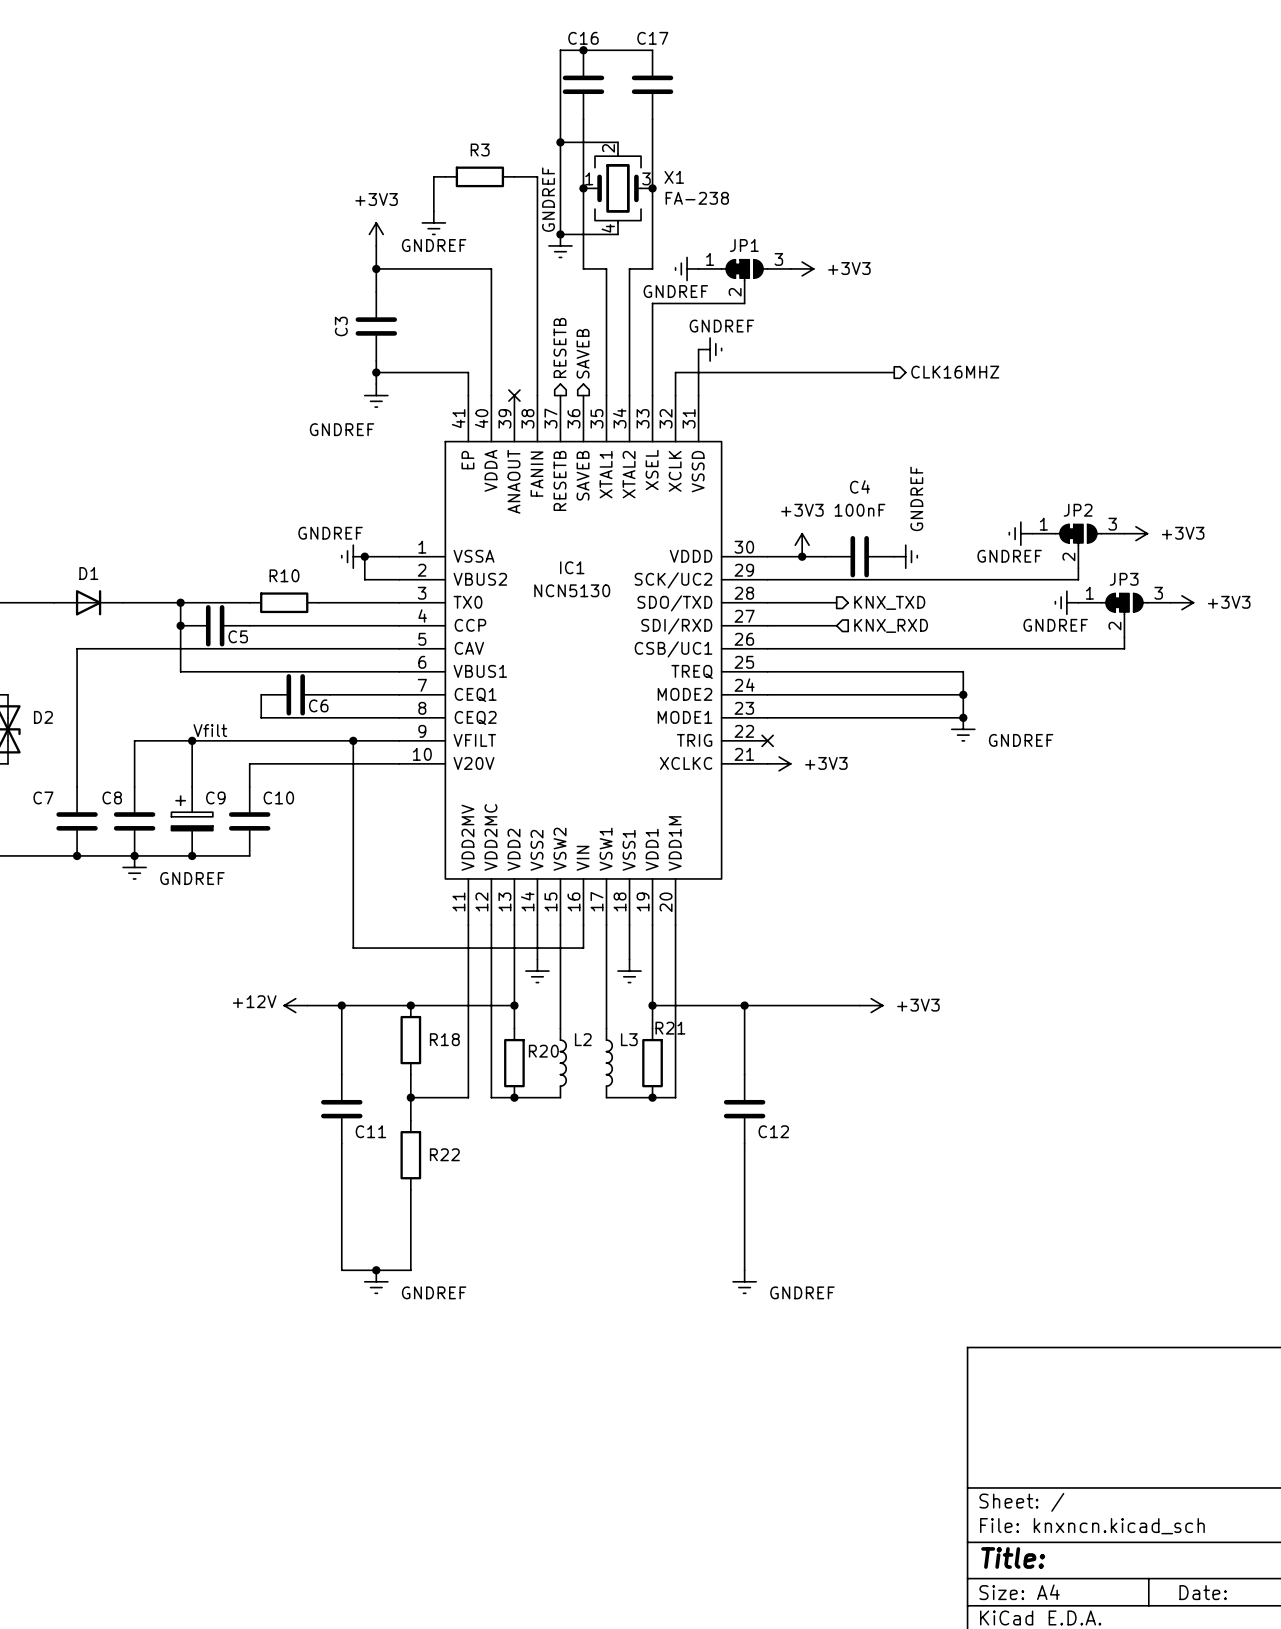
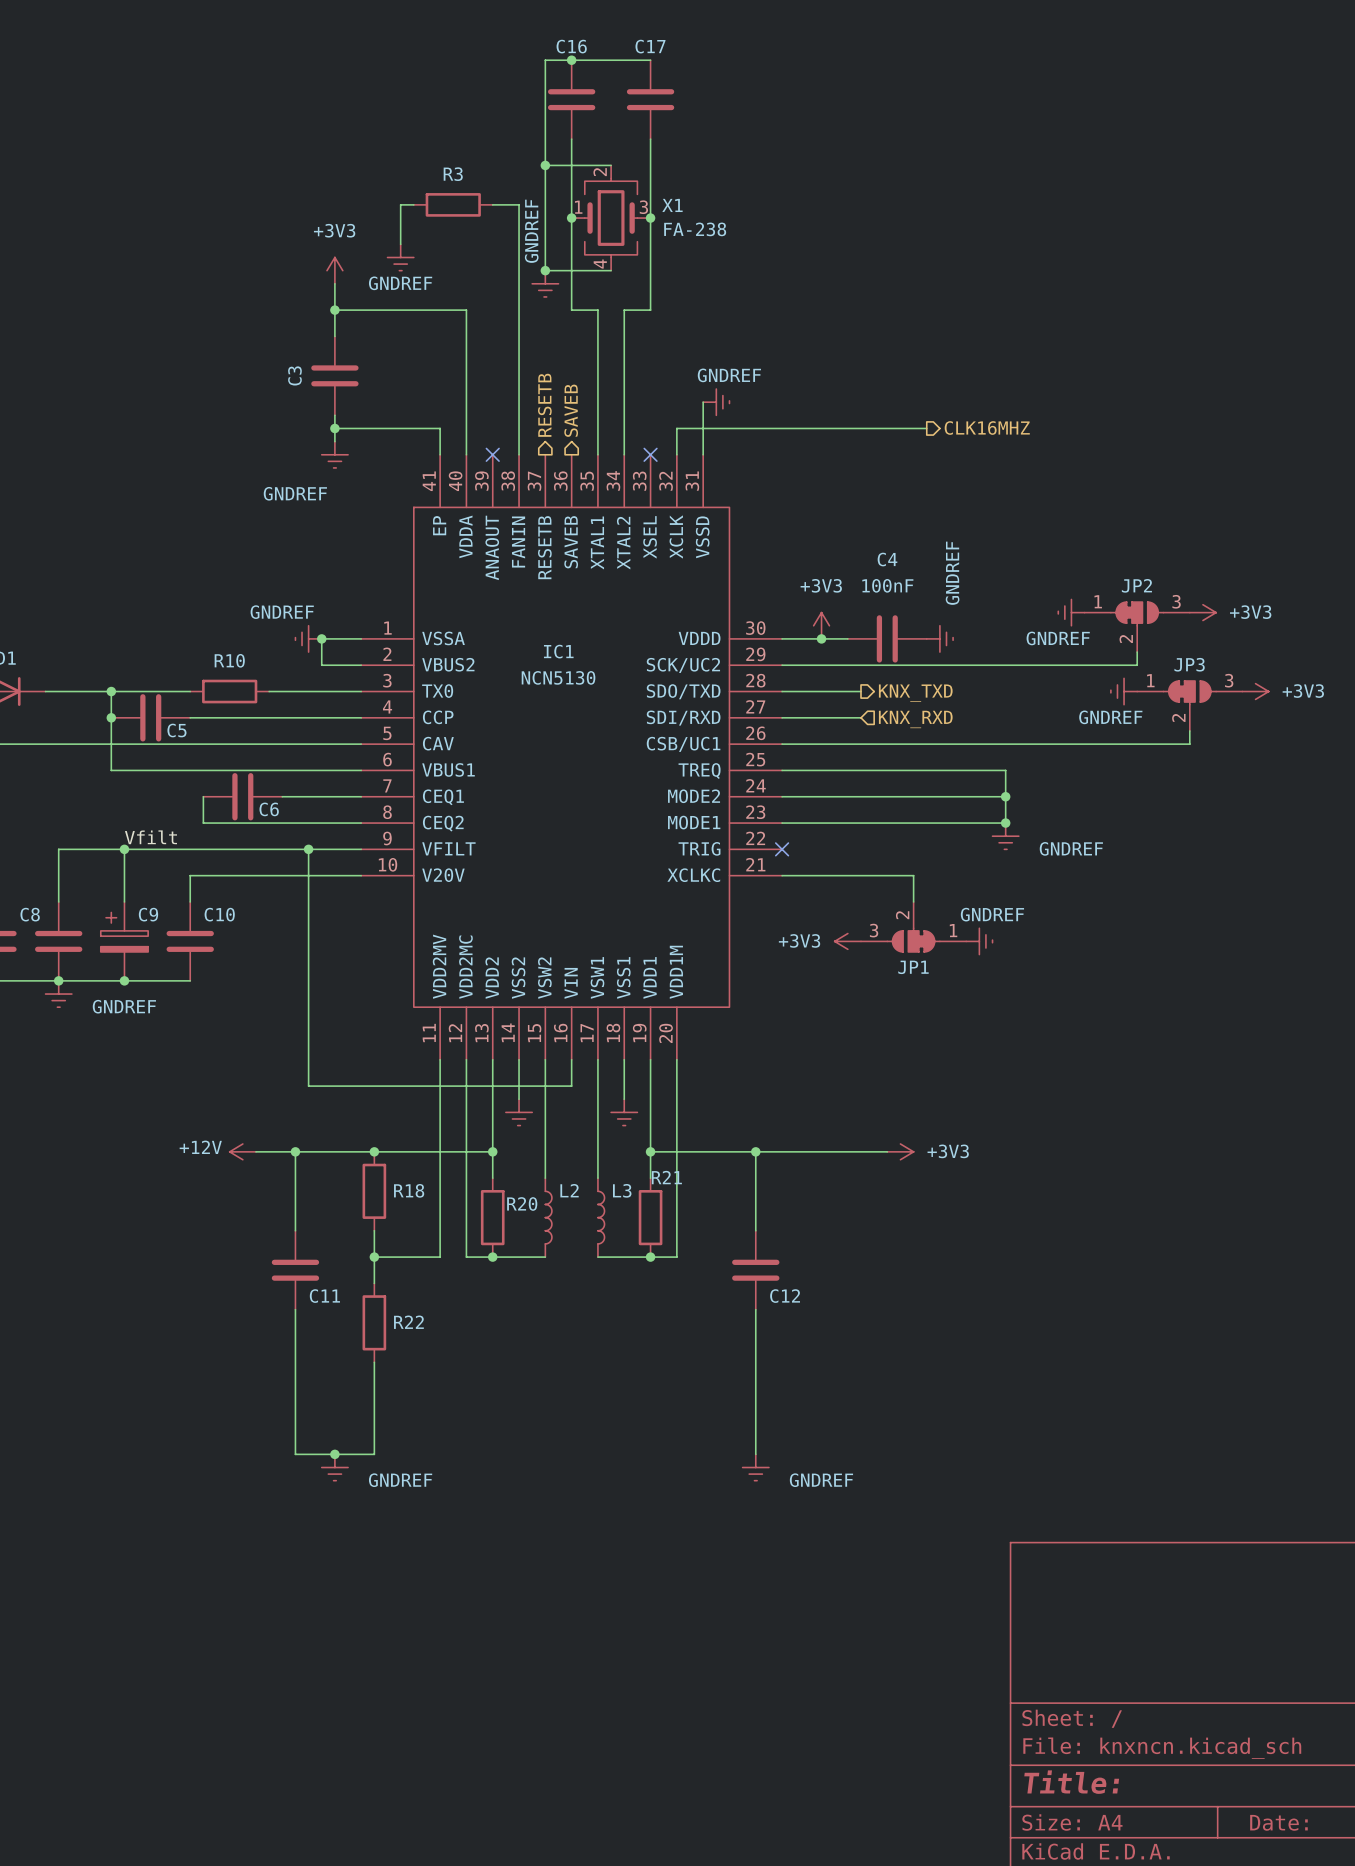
power symbol: GNDREF (687, 268) -> none
power symbol: +3V3 (802, 268) -> none
JP1 rotation: 0° (744, 270) -> 180° (913, 940)
JP1 position: (744, 281) -> (913, 926)
wire: (744, 303) (652, 303) (652, 395) -> none
no-connect mark: none -> (650, 454)
wire: none -> (782, 875) (913, 875) (913, 901)
power symbol rotation: 0° (779, 763) -> 180° (847, 941)
power symbol position: +3V3 (779, 763) -> +3V3 (847, 941)
power symbol: none -> GNDREF (979, 941)

